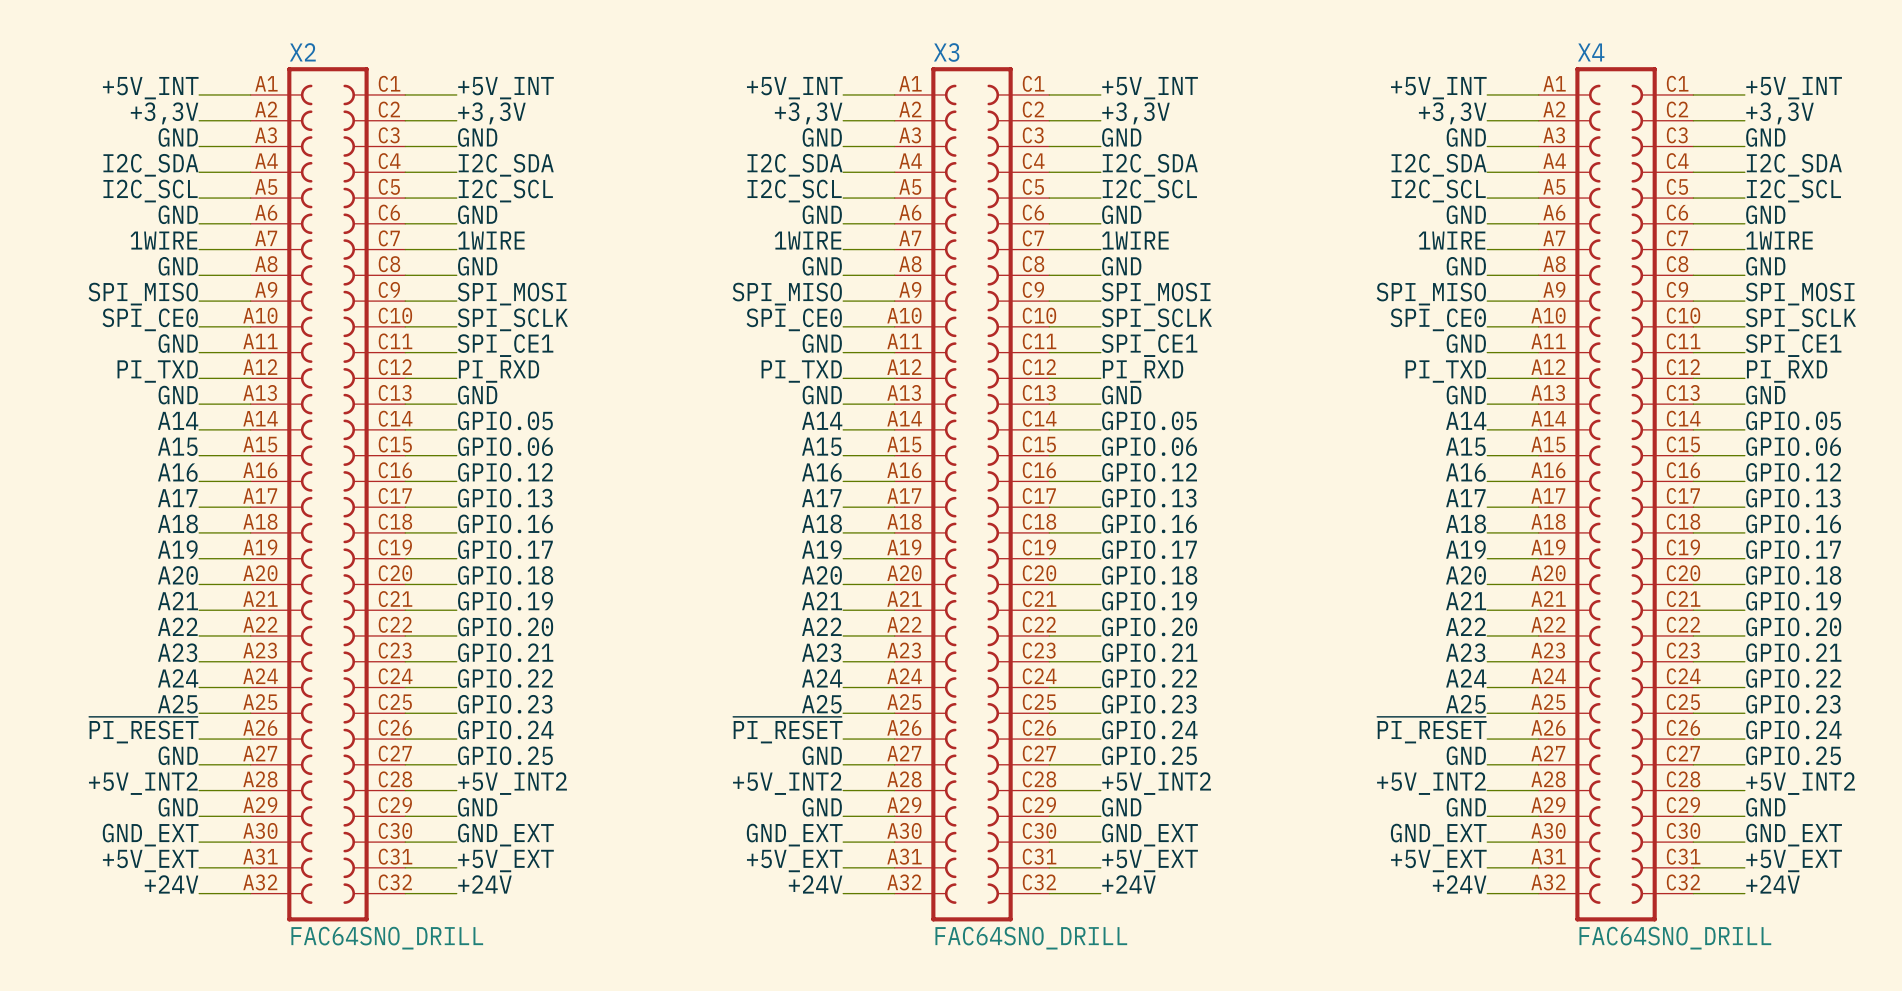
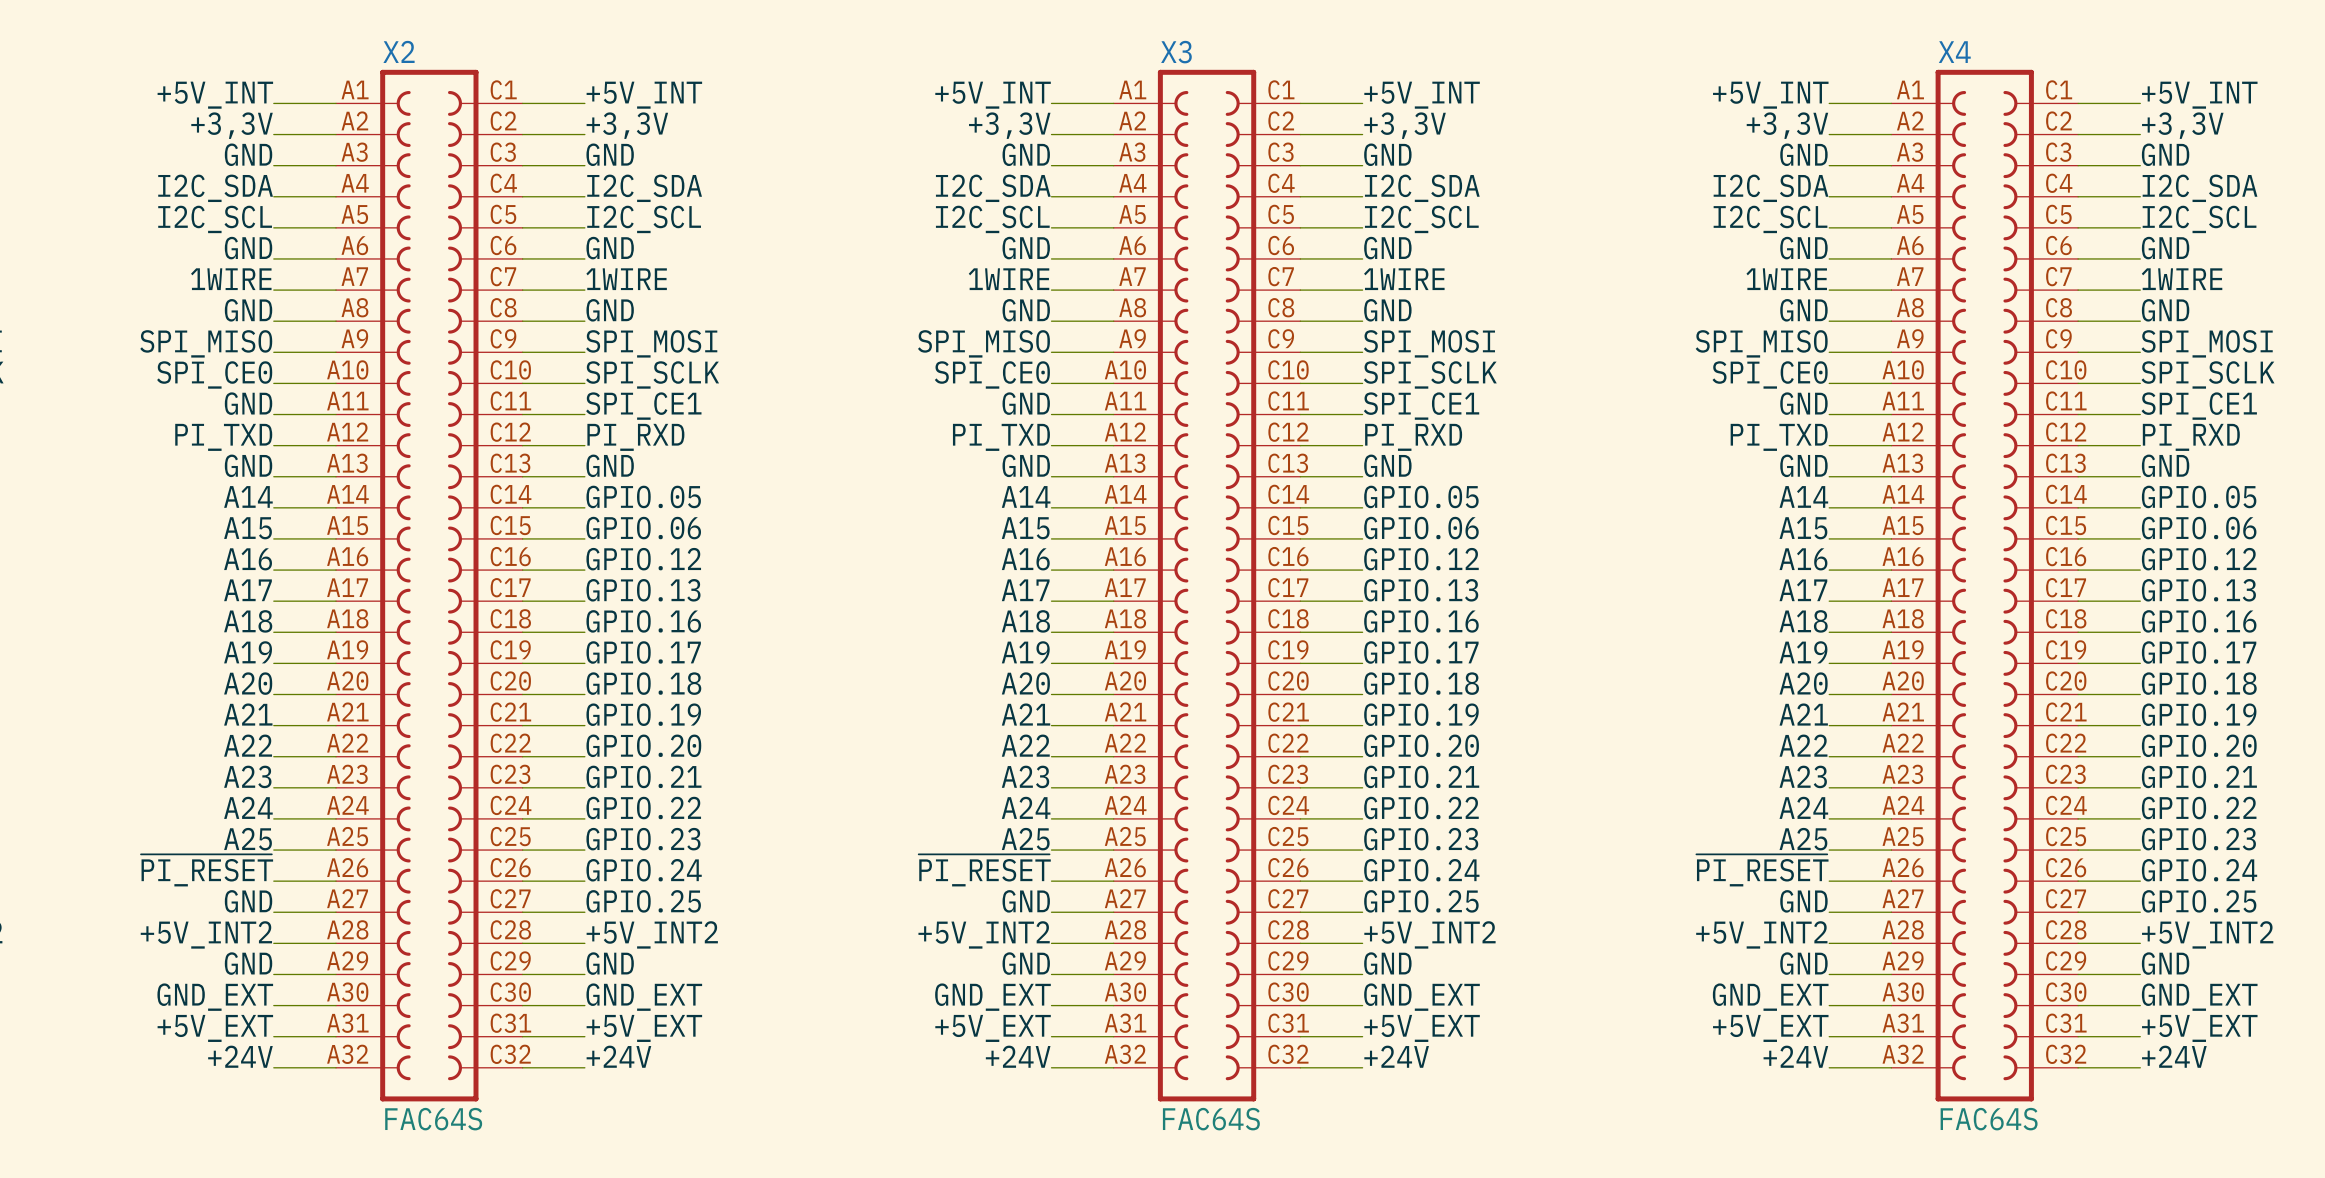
X2 value: FAC64SNO_DRILL (387, 938) -> FAC64S (433, 1119)
X3 value: FAC64SNO_DRILL (1031, 938) -> FAC64S (1211, 1119)
X4 value: FAC64SNO_DRILL (1675, 938) -> FAC64S (1989, 1119)

